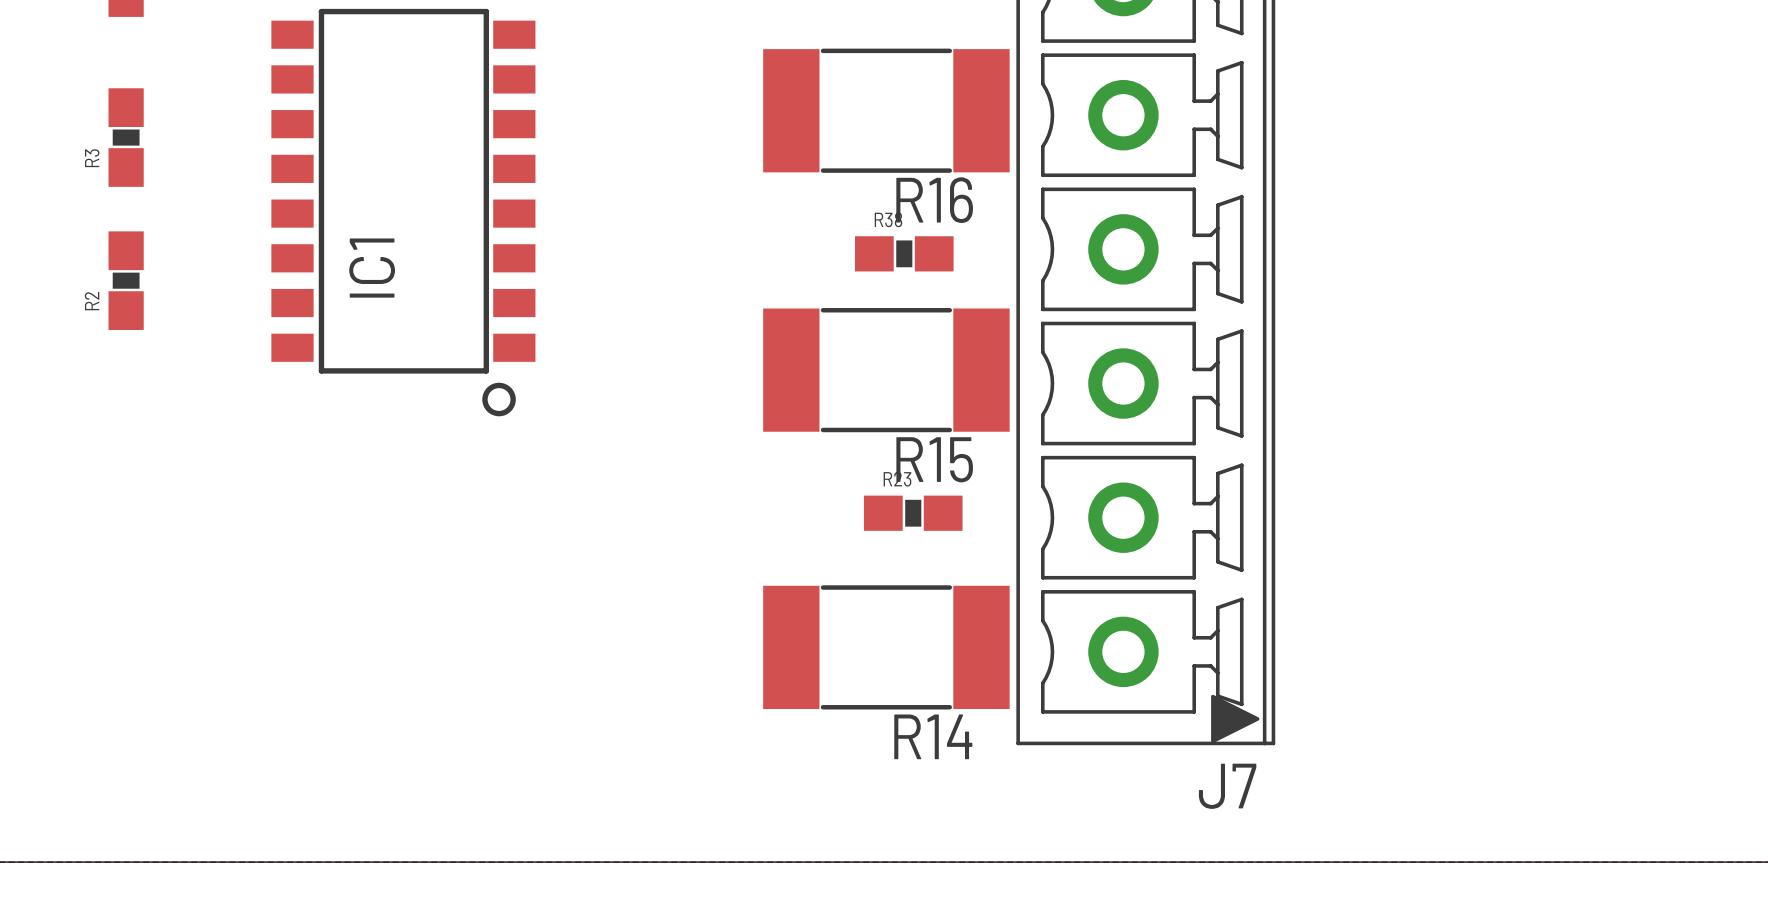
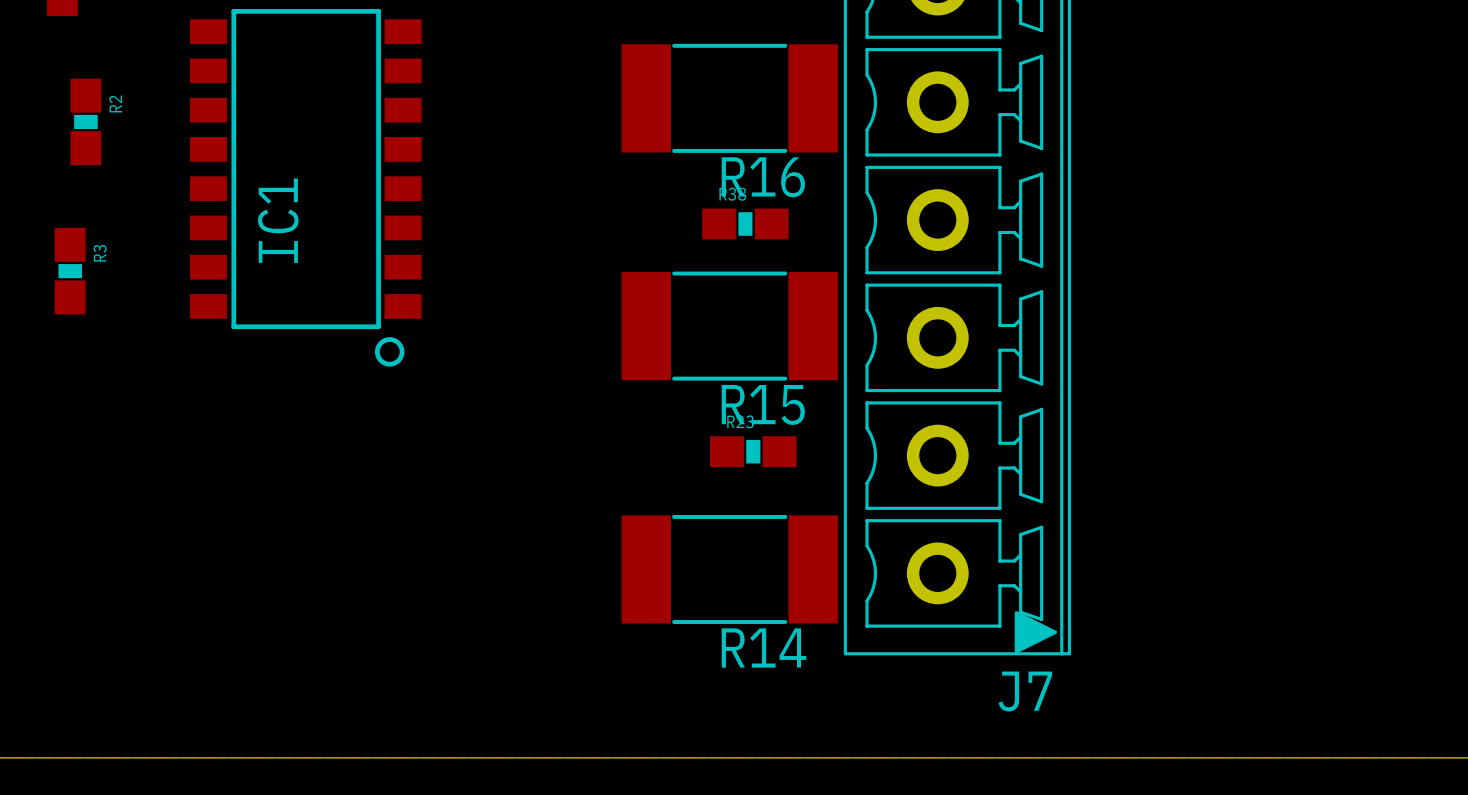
R3 position: (126, 137) -> (70, 271)
R3 name position: R3 (92, 158) -> R3 (100, 253)
R2 position: (126, 280) -> (85, 121)
R2 name position: R2 (92, 301) -> R2 (115, 103)

